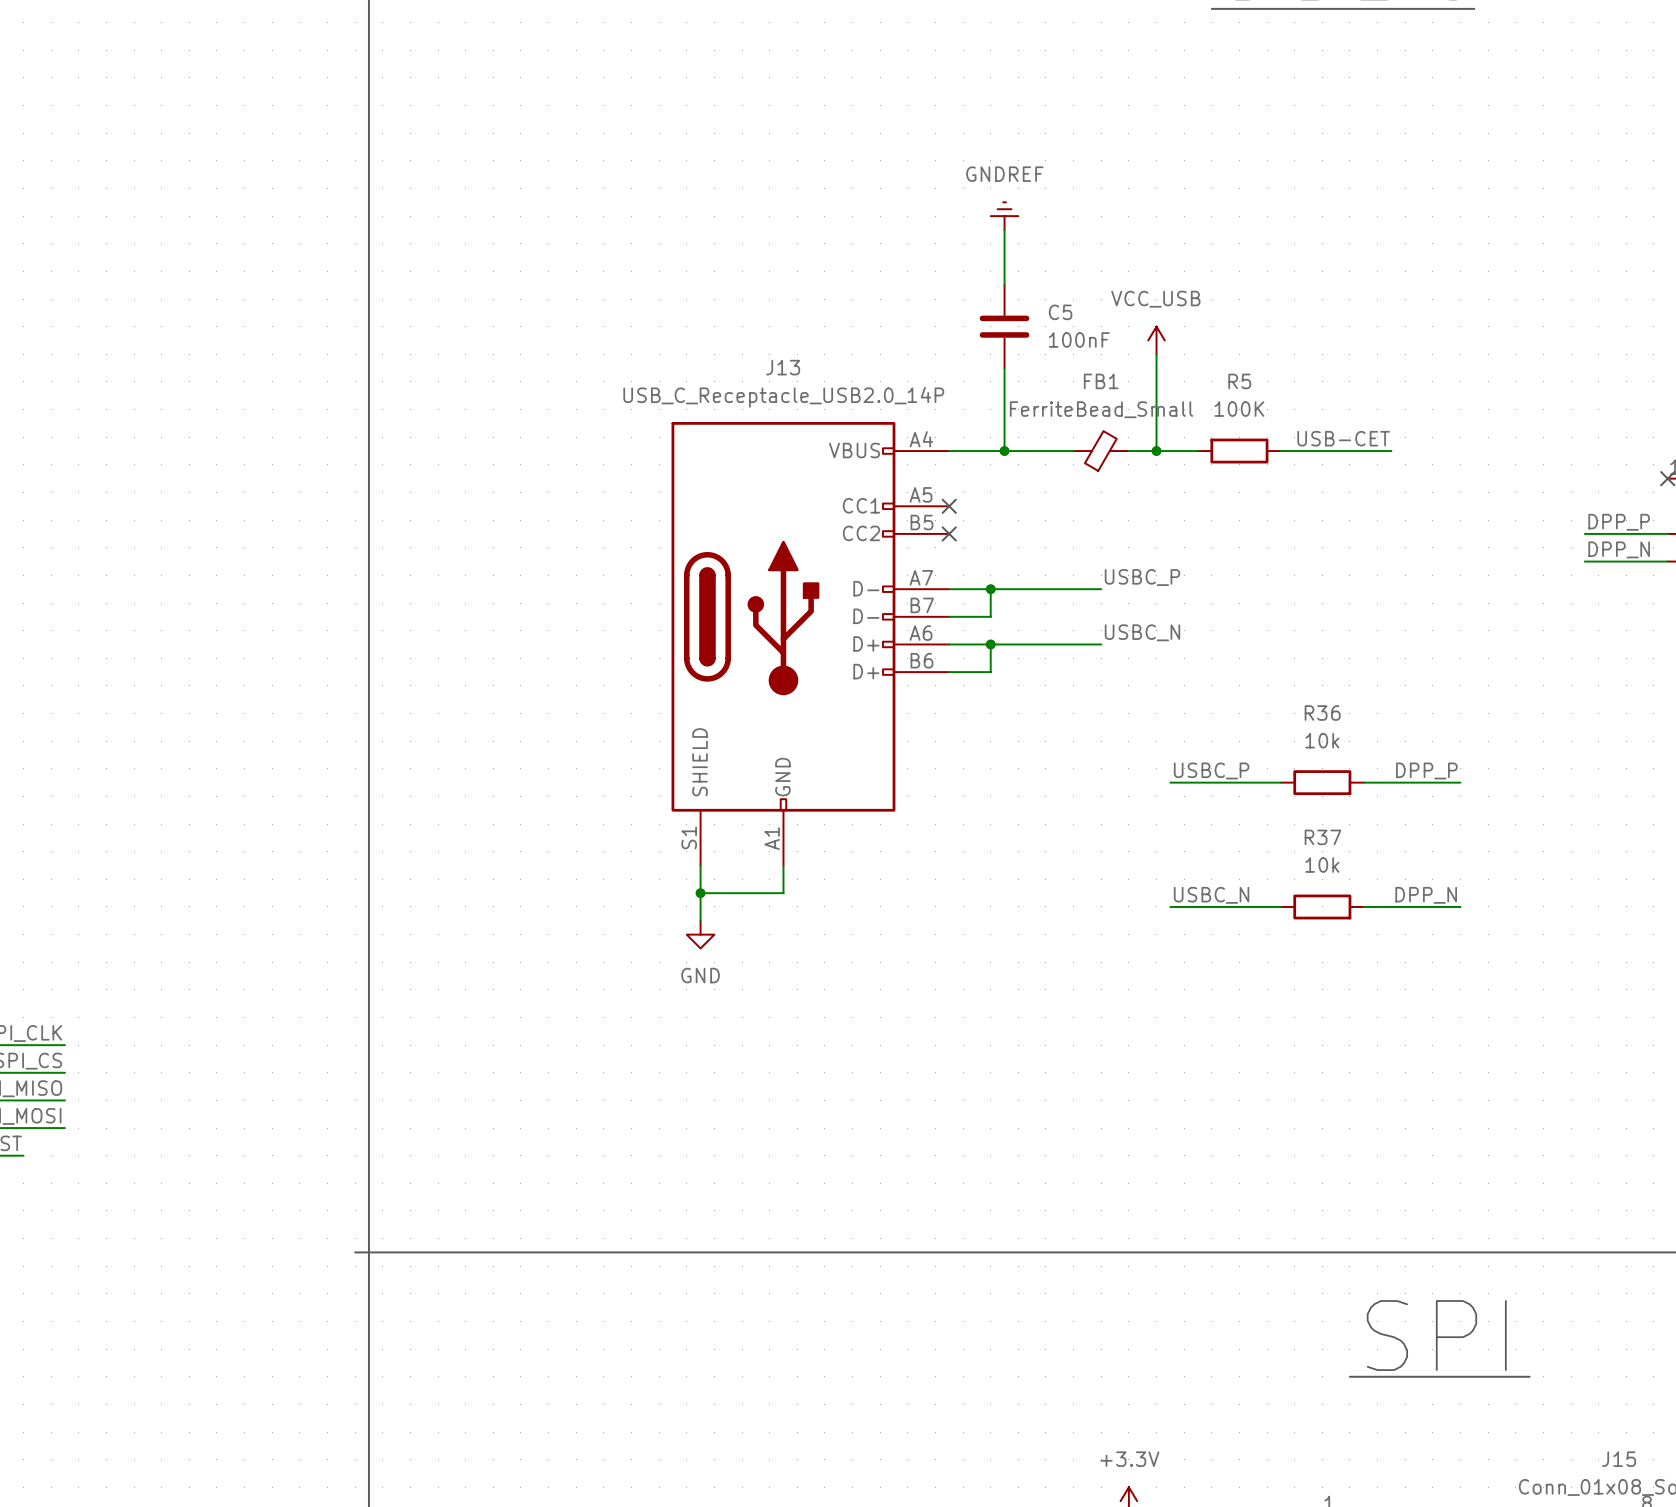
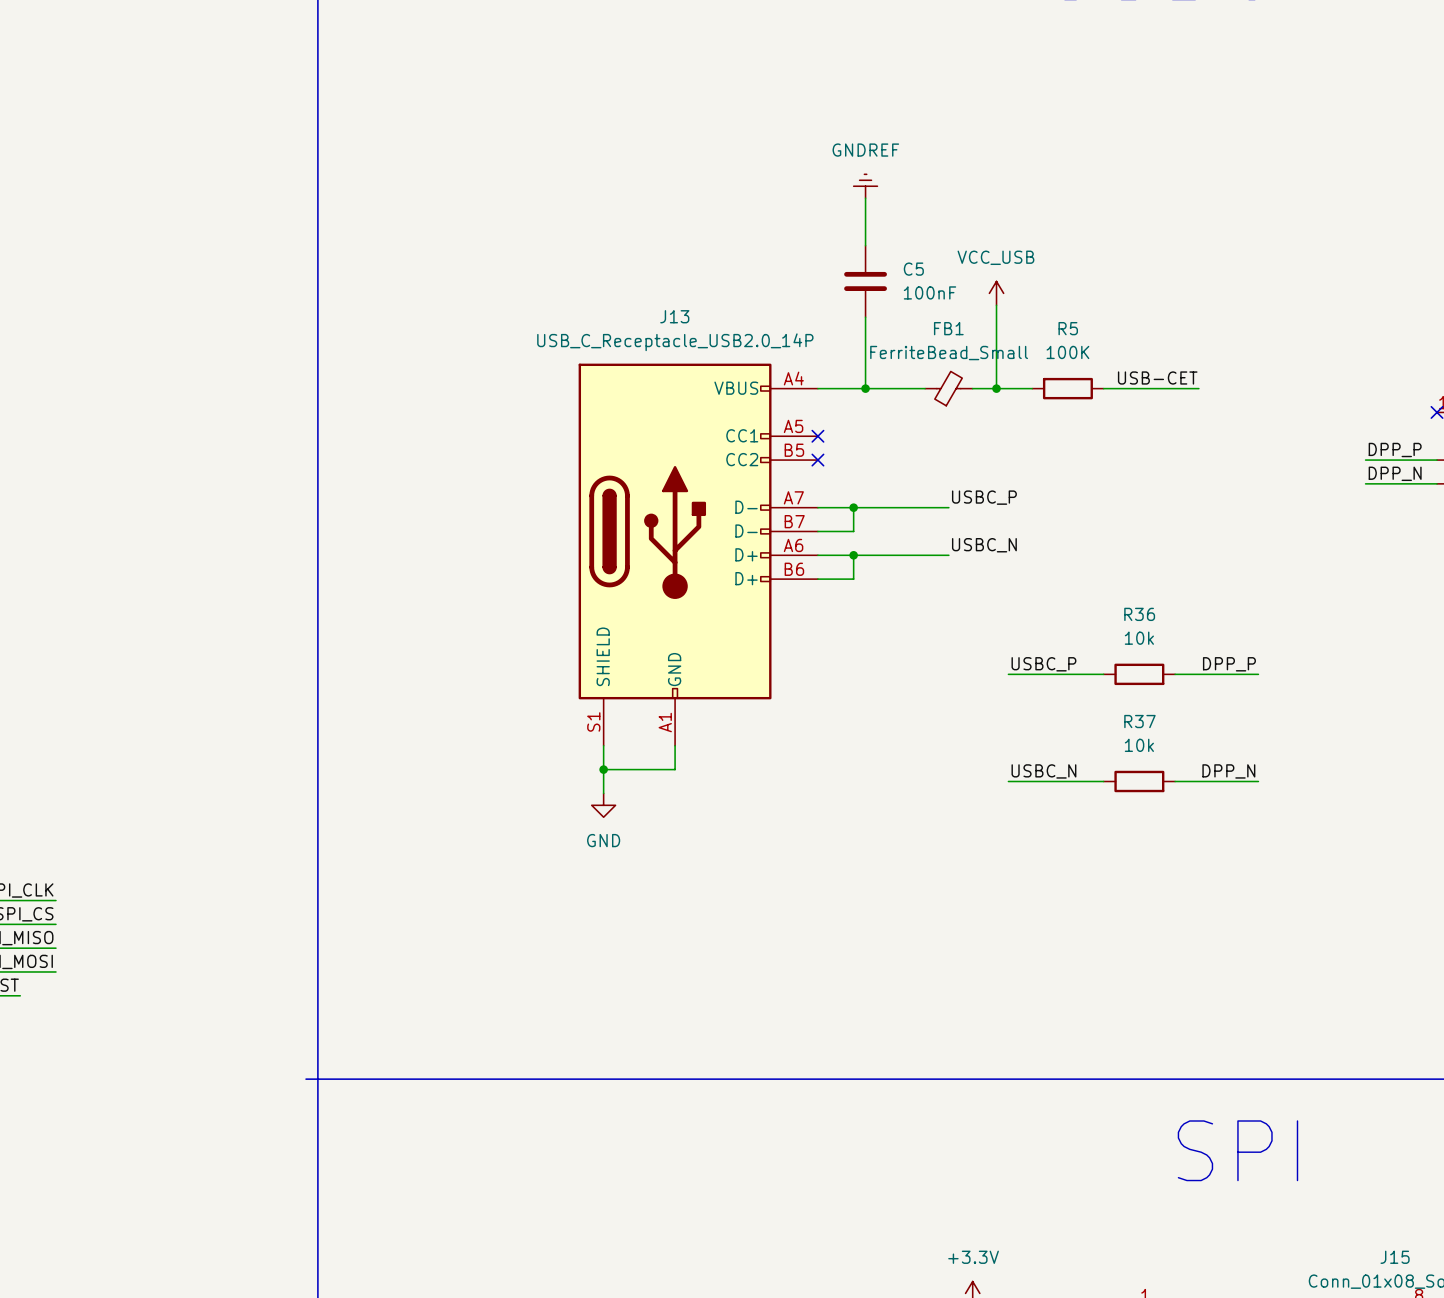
bus: (1211, 8) (1474, 8) -> none
bus: (1349, 1376) (1529, 1376) -> none

